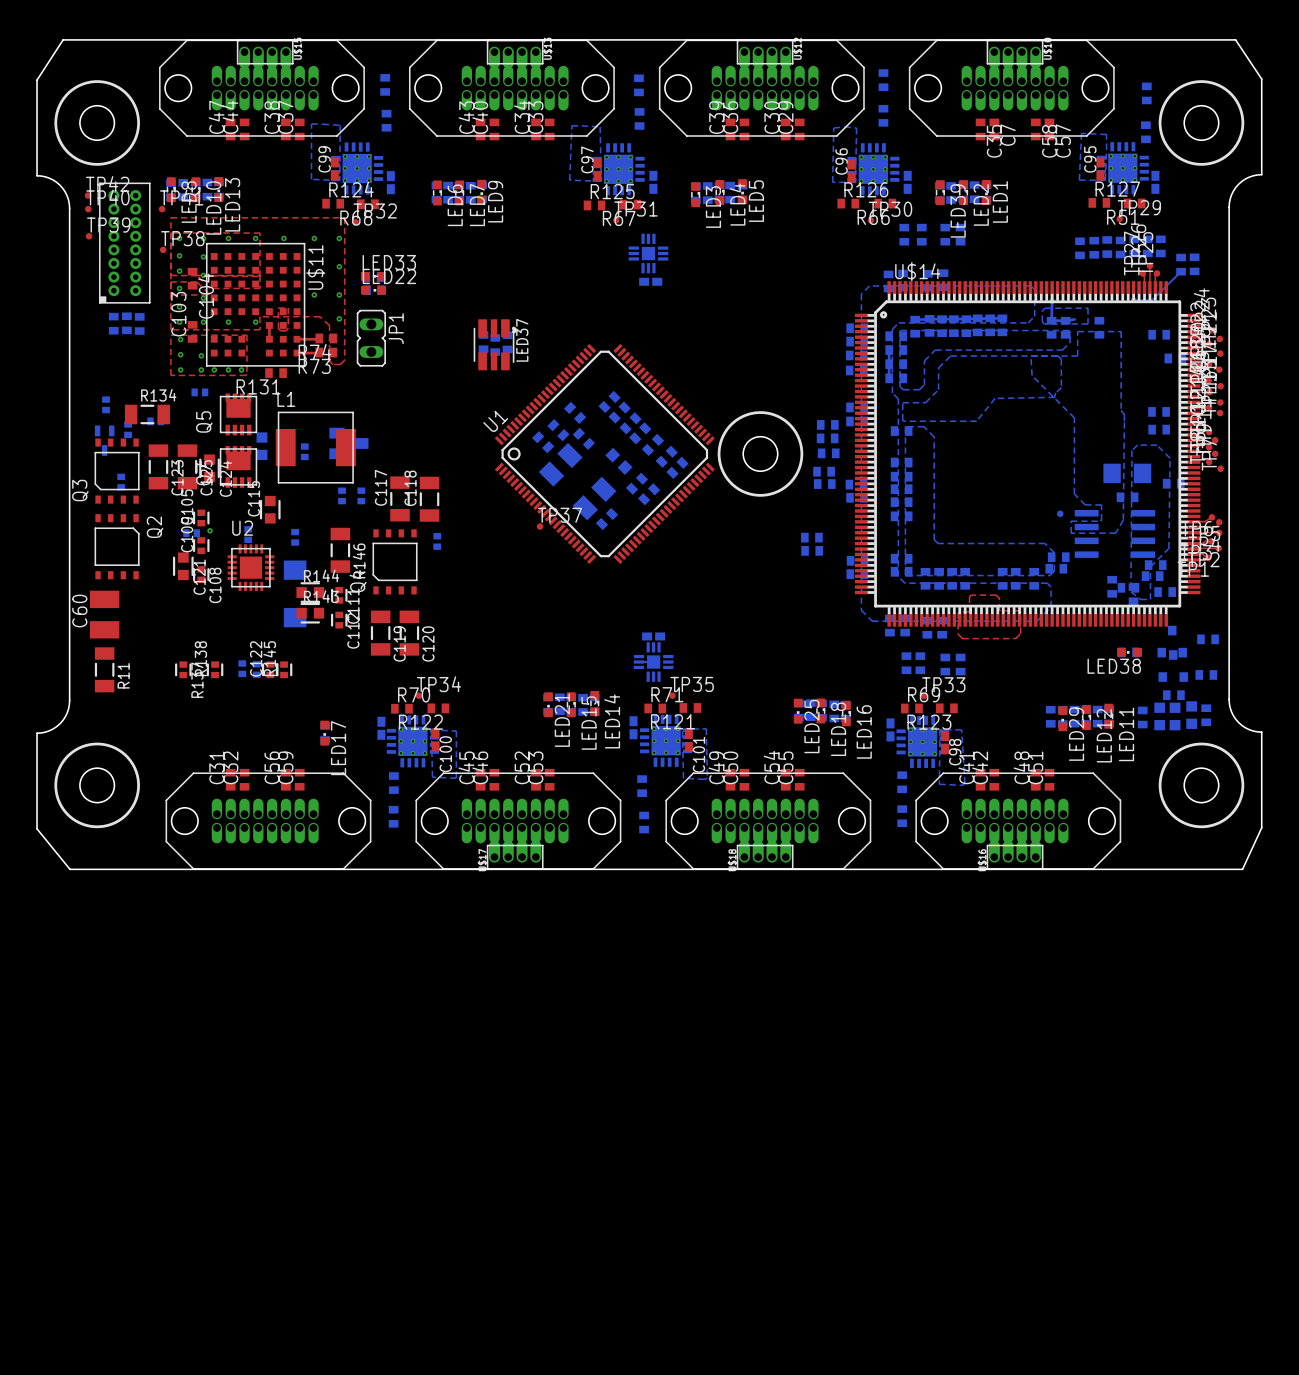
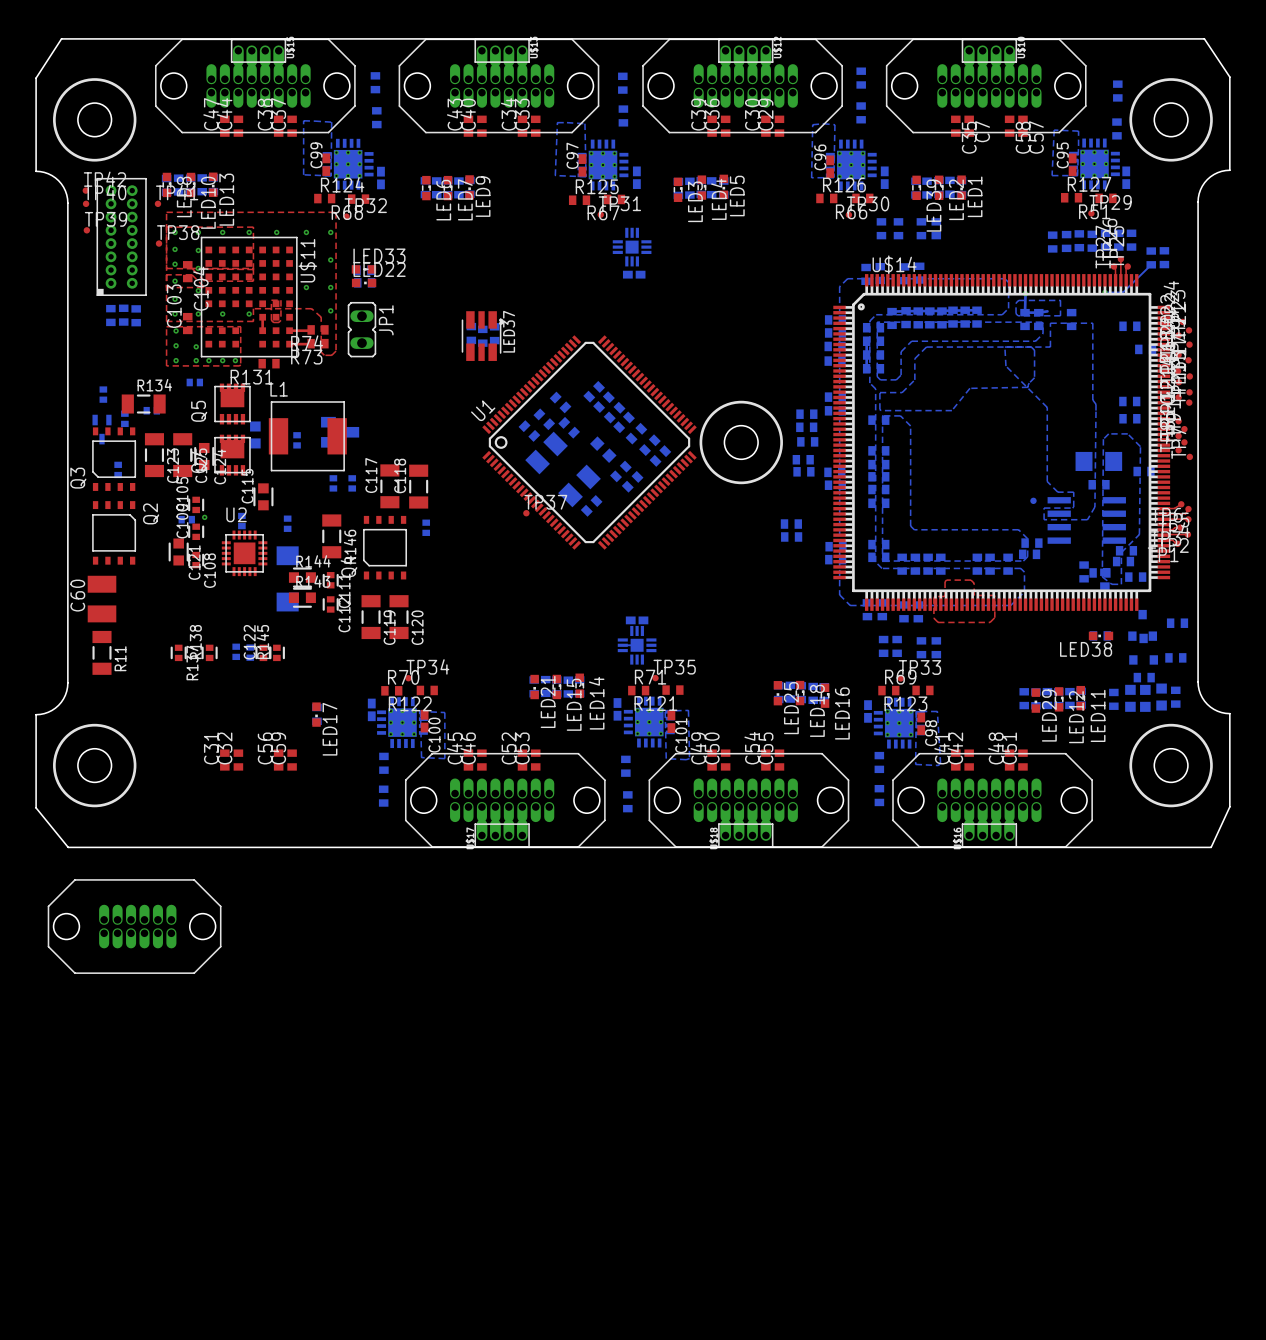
part: (268, 821) -> none
part: none -> (134, 926)

